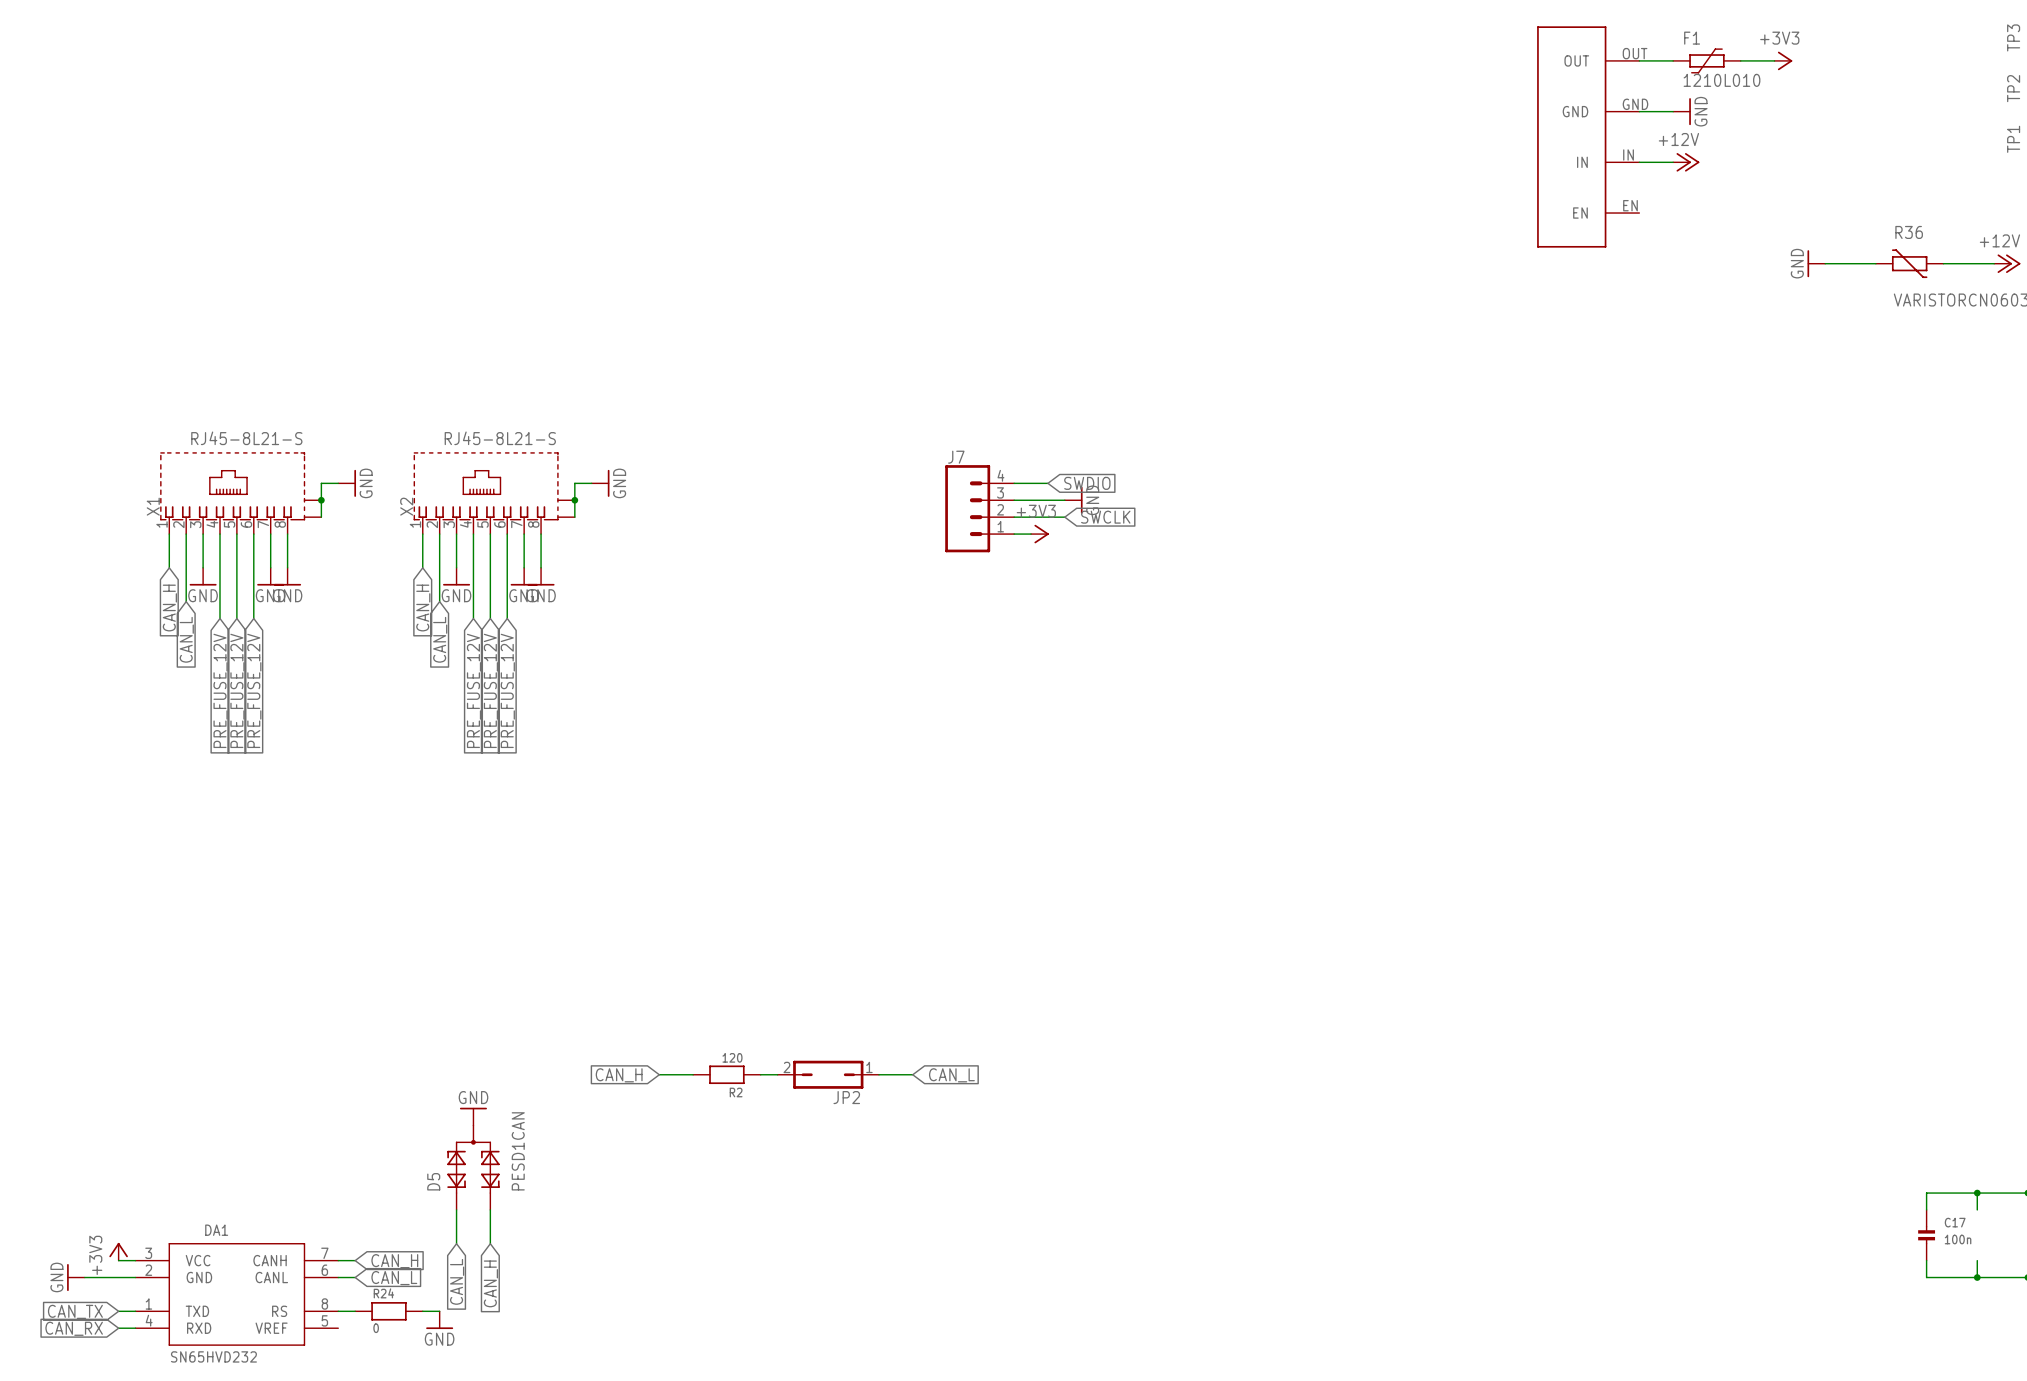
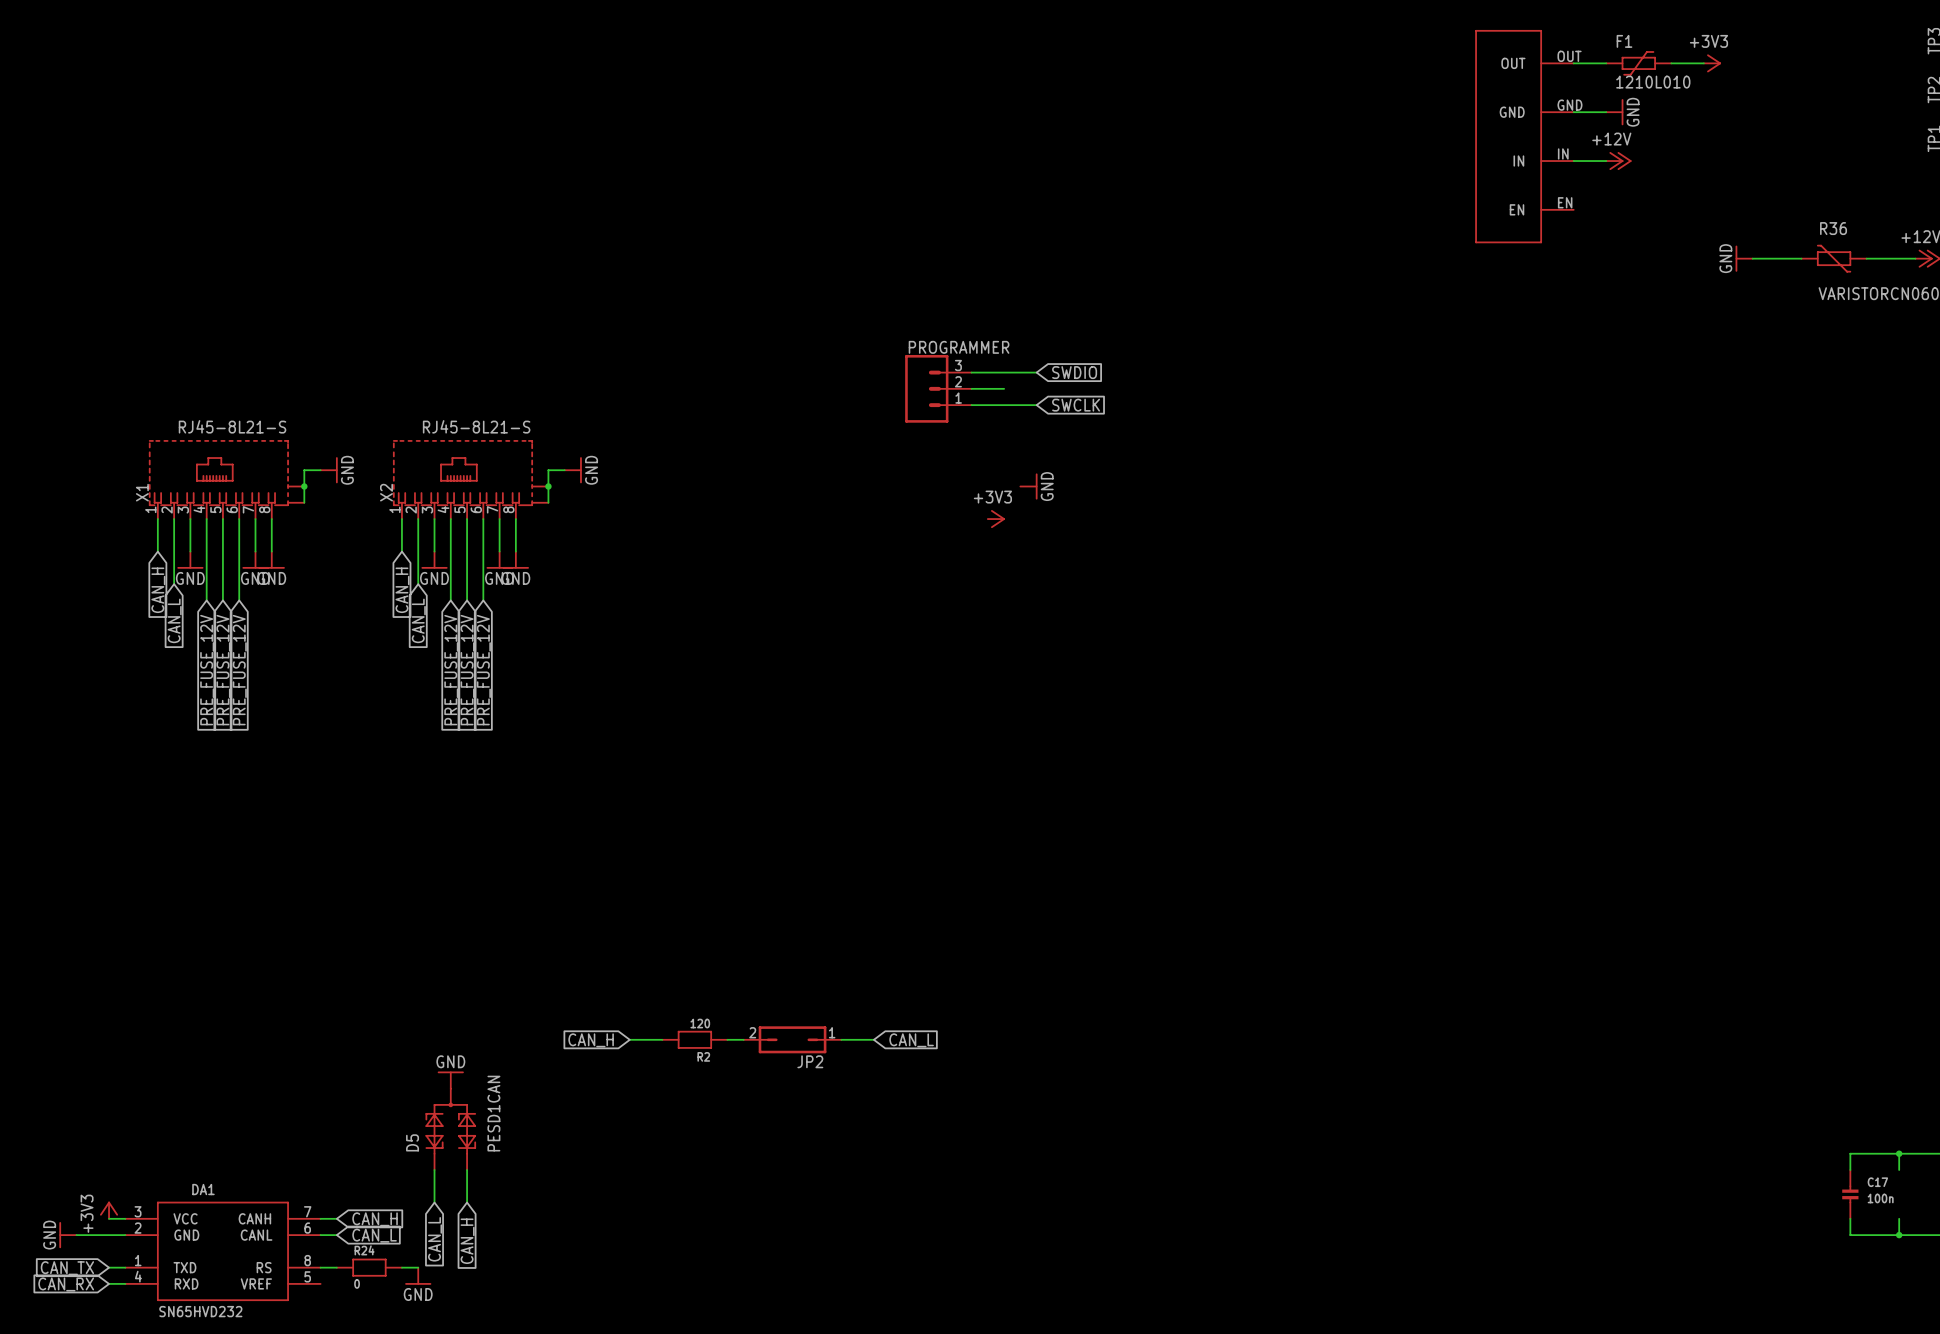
wire: none -> (971, 372) (1036, 372)
PROGRAMMER: none -> (938, 388)
wire: none -> (971, 405) (1036, 405)
wire: (1014, 483) (1047, 483) -> (971, 388) (1004, 388)
global label position: SWDIO (1087, 483) -> SWDIO (1074, 372)
wire: (1014, 500) (1064, 500) -> none
J7: (979, 508) -> none
wire: (1014, 517) (1064, 517) -> none
global label position: SWCLK (1105, 517) -> SWCLK (1076, 405)
wire: (1014, 534) (1031, 534) -> none

